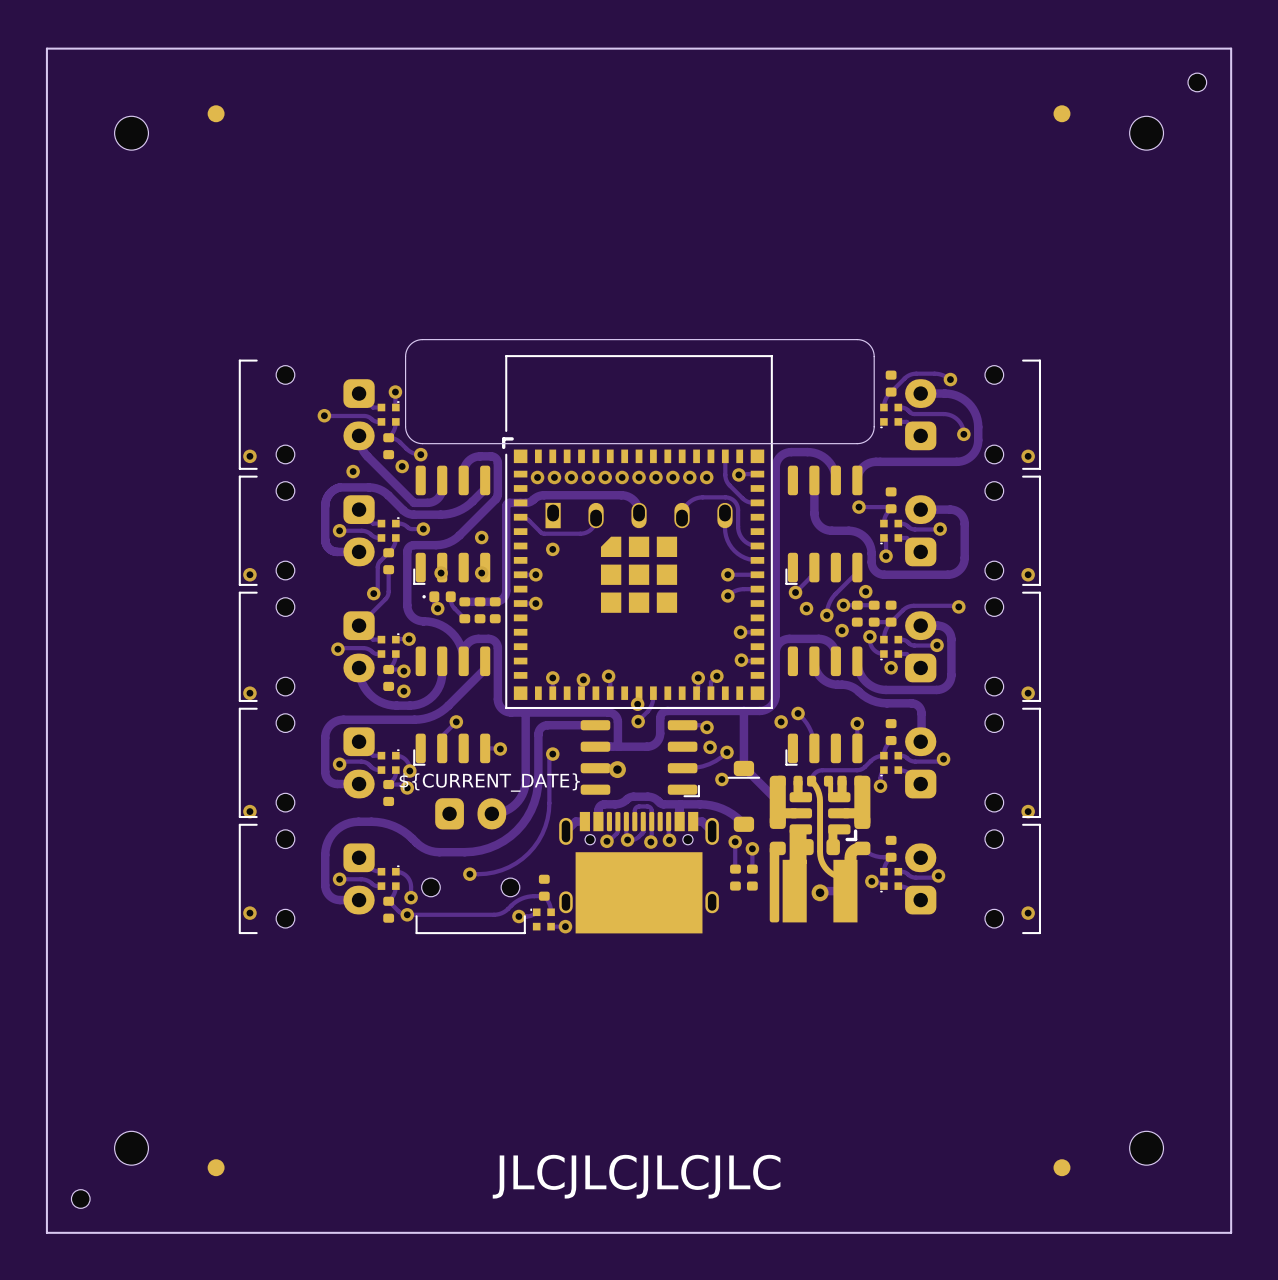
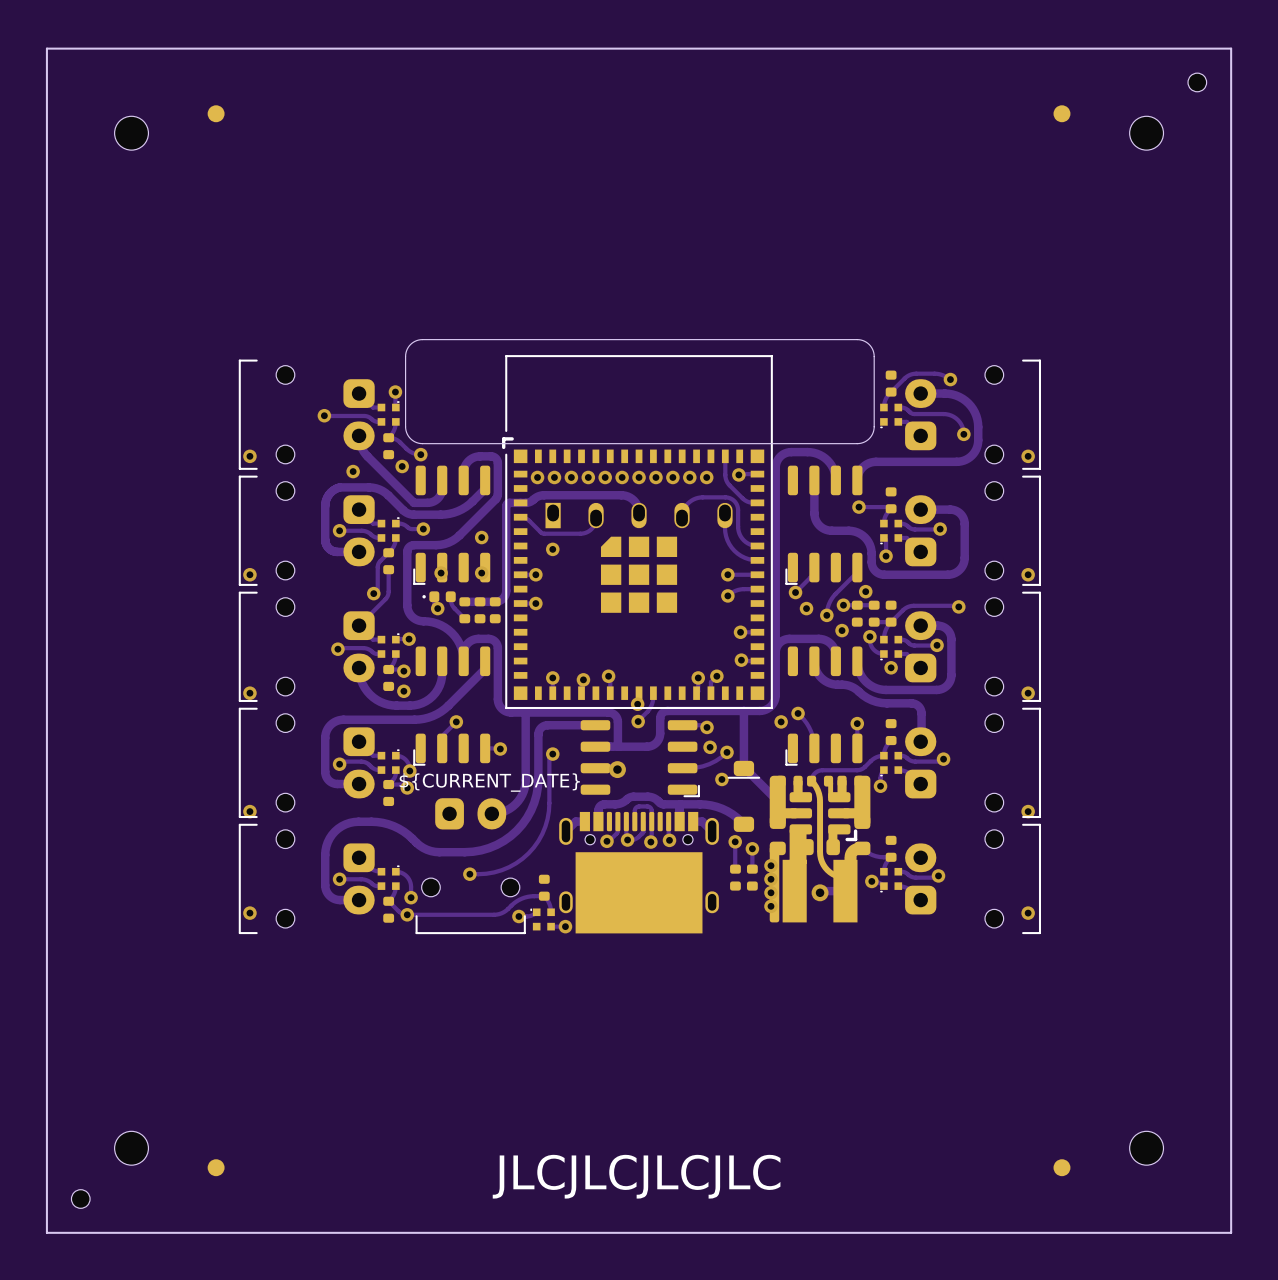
via: none -> (771, 865)
via: none -> (771, 879)
via: none -> (771, 892)
via: none -> (771, 906)

